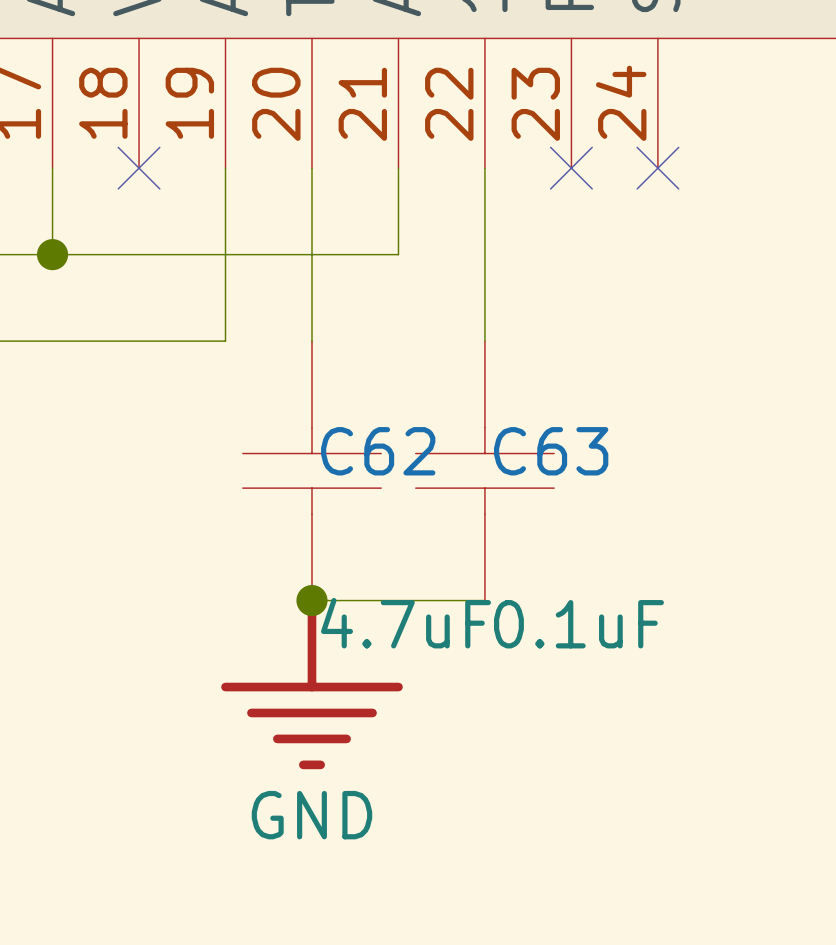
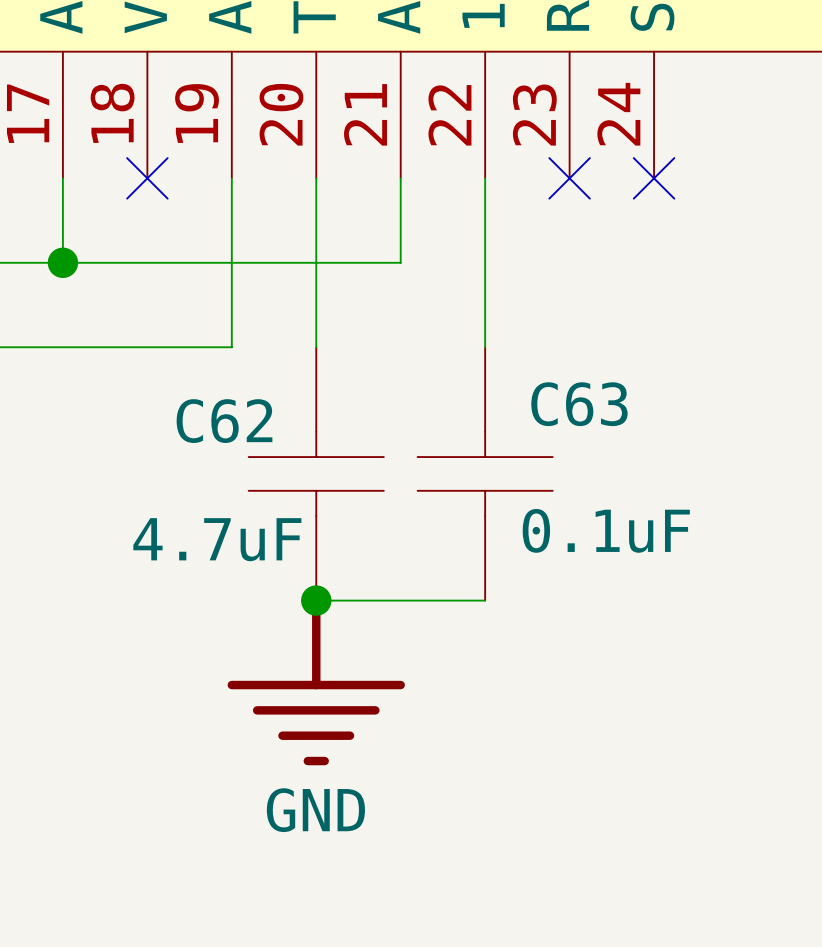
C62 name position: C62 (378, 451) -> C62 (224, 421)
C63 name position: C63 (551, 451) -> C63 (579, 404)
C62 value position: 4.7uF (406, 623) -> 4.7uF (217, 539)
C63 value position: 0.1uF (578, 624) -> 0.1uF (606, 530)

